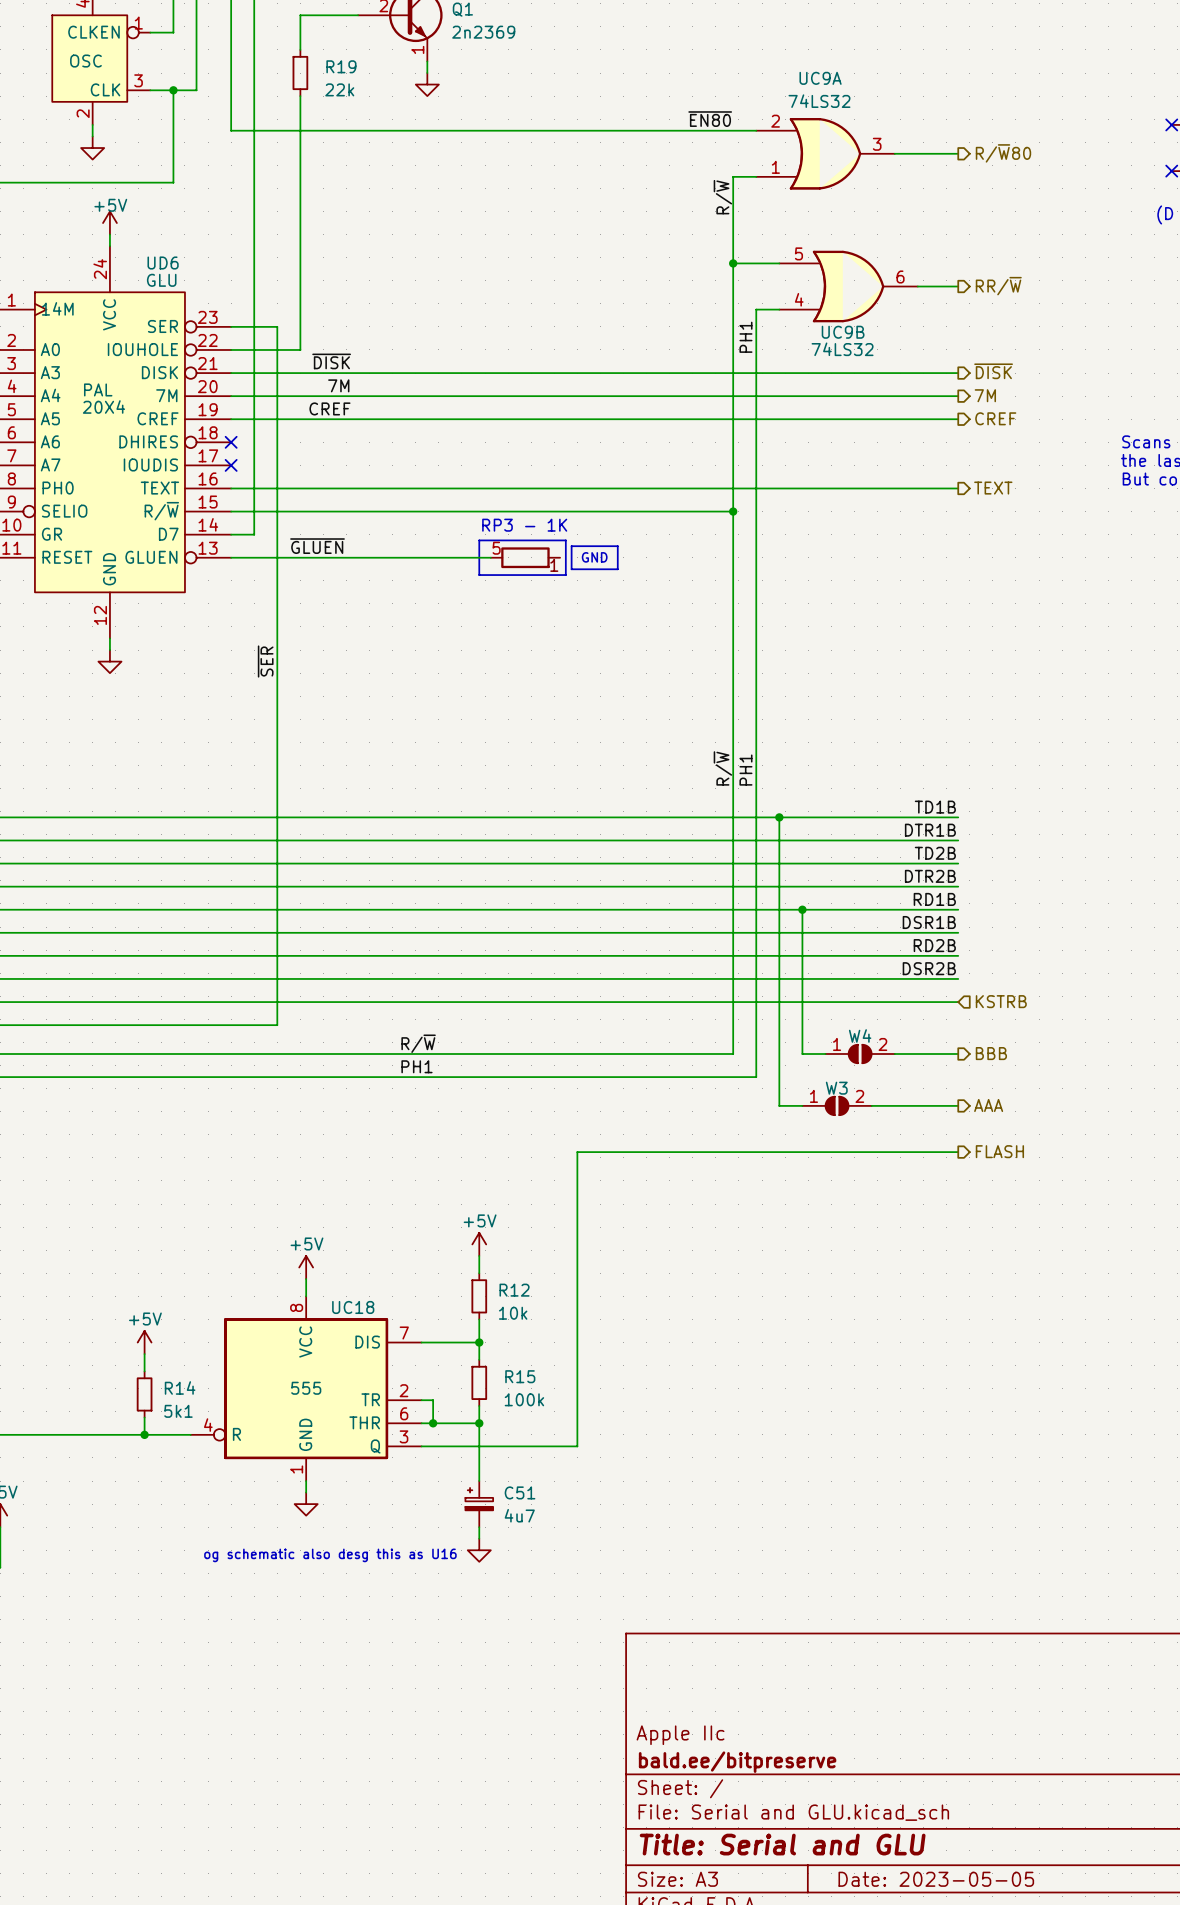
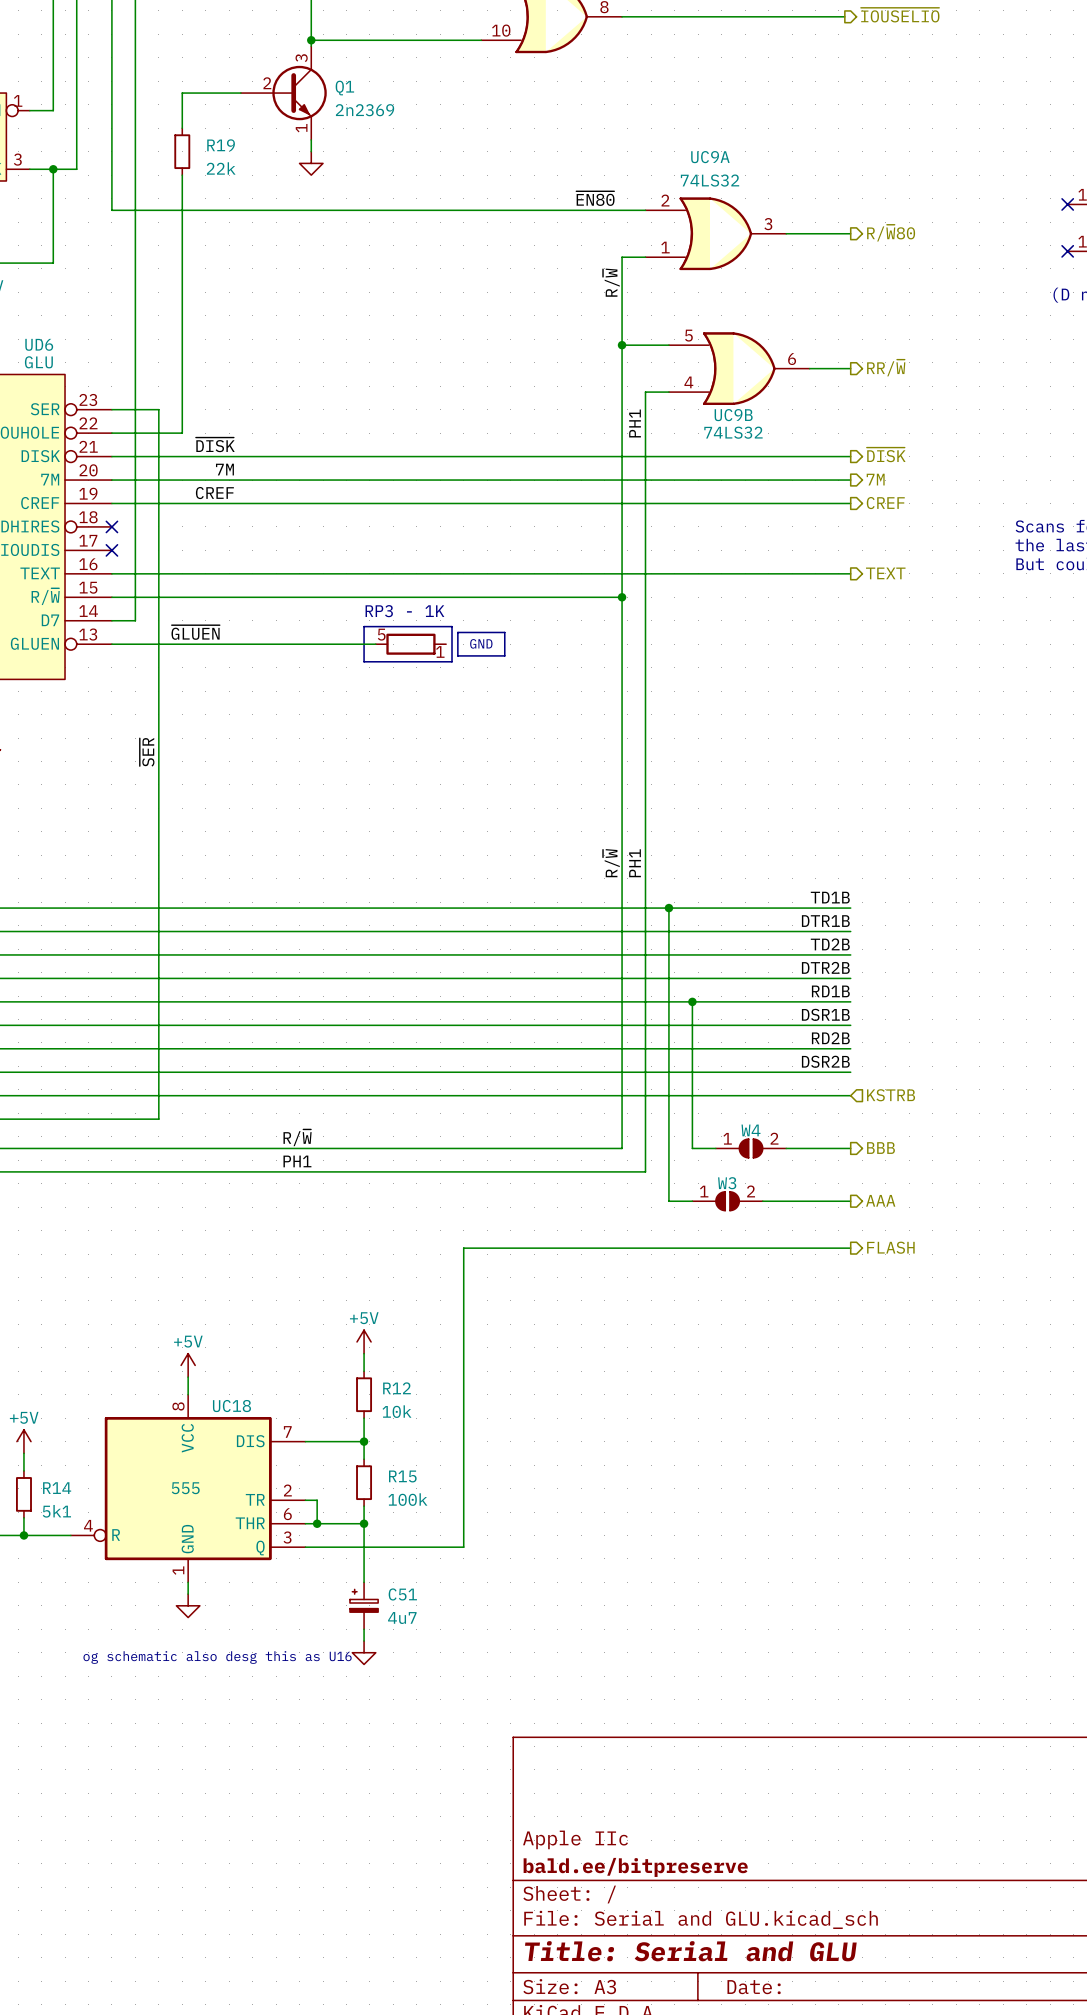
title block: Date: 2023-05-05 (936, 1879) -> Date: (754, 1987)

